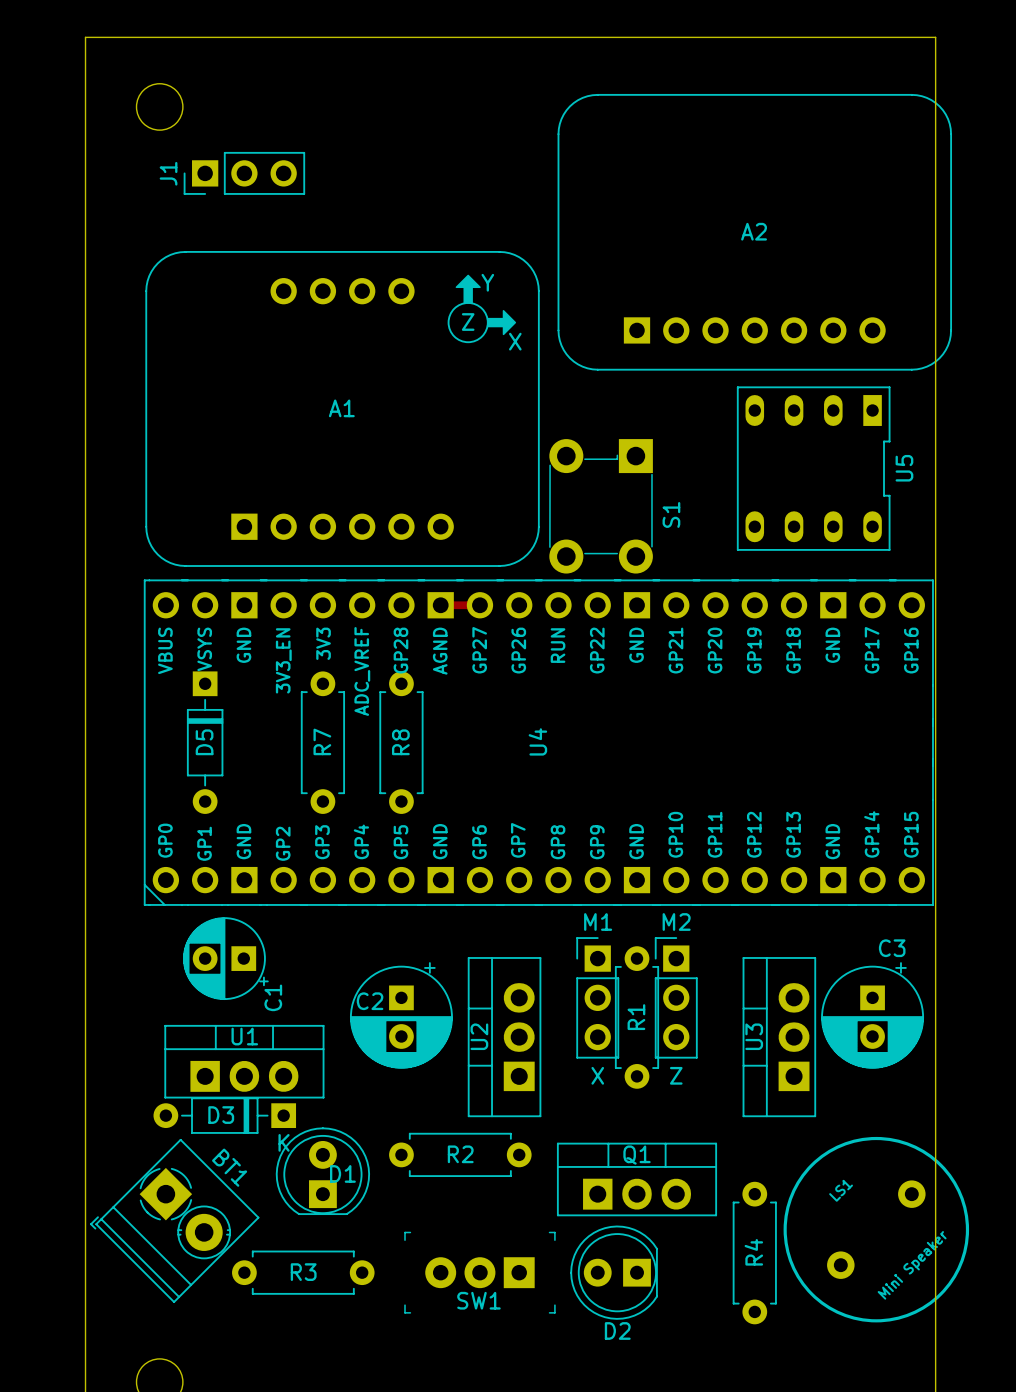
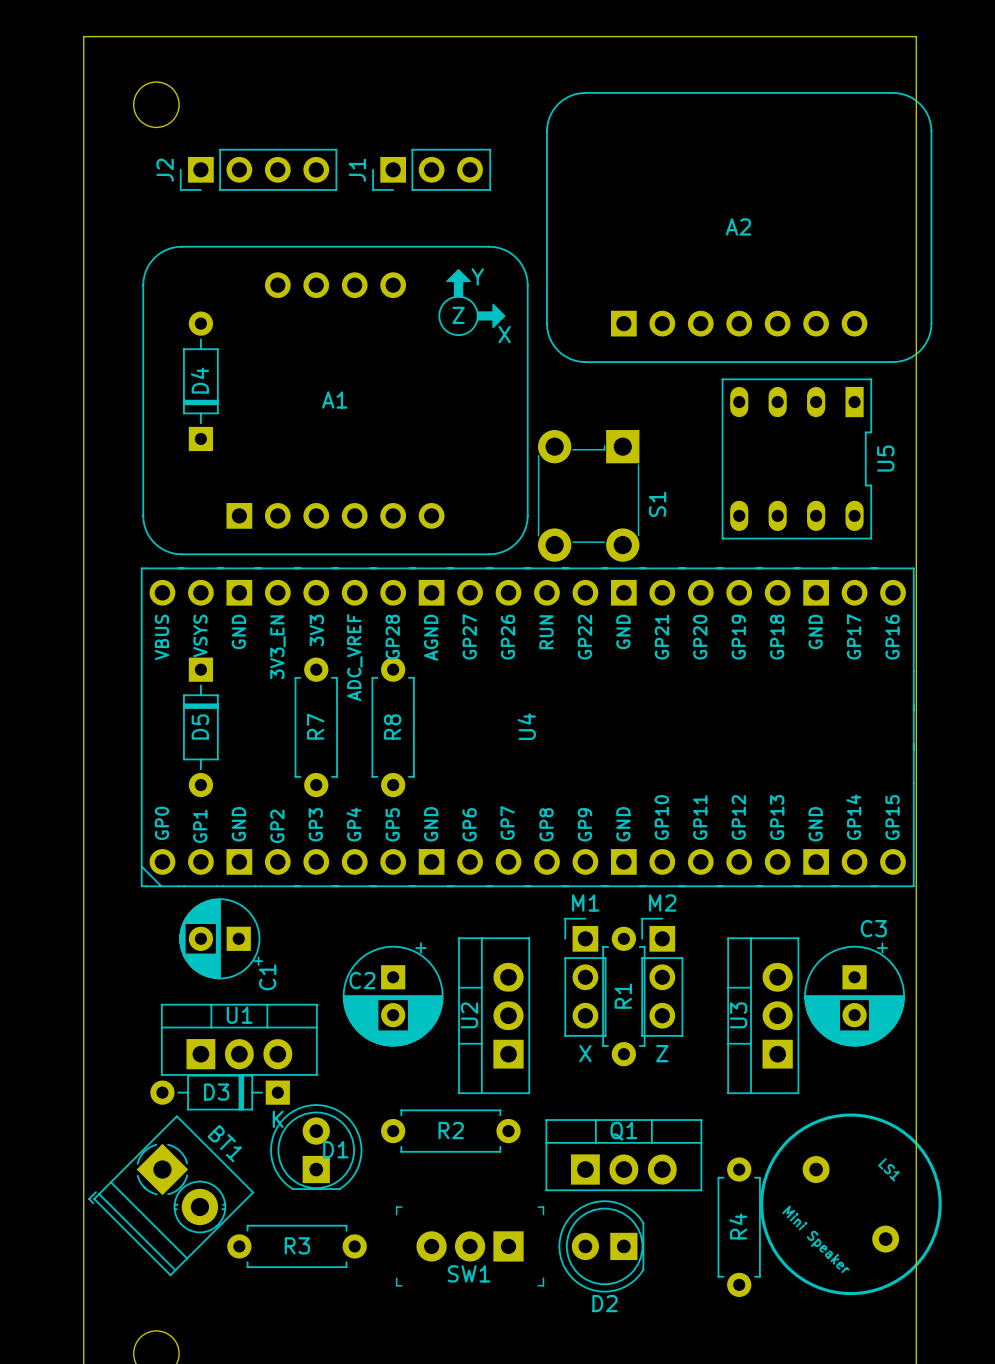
J1 position: (244, 173) -> (431, 169)
J2: none -> (258, 169)
D4: none -> (200, 381)
part: (460, 605) -> none
LS1 rotation: 0° (876, 1229) -> 90° clockwise (850, 1204)

